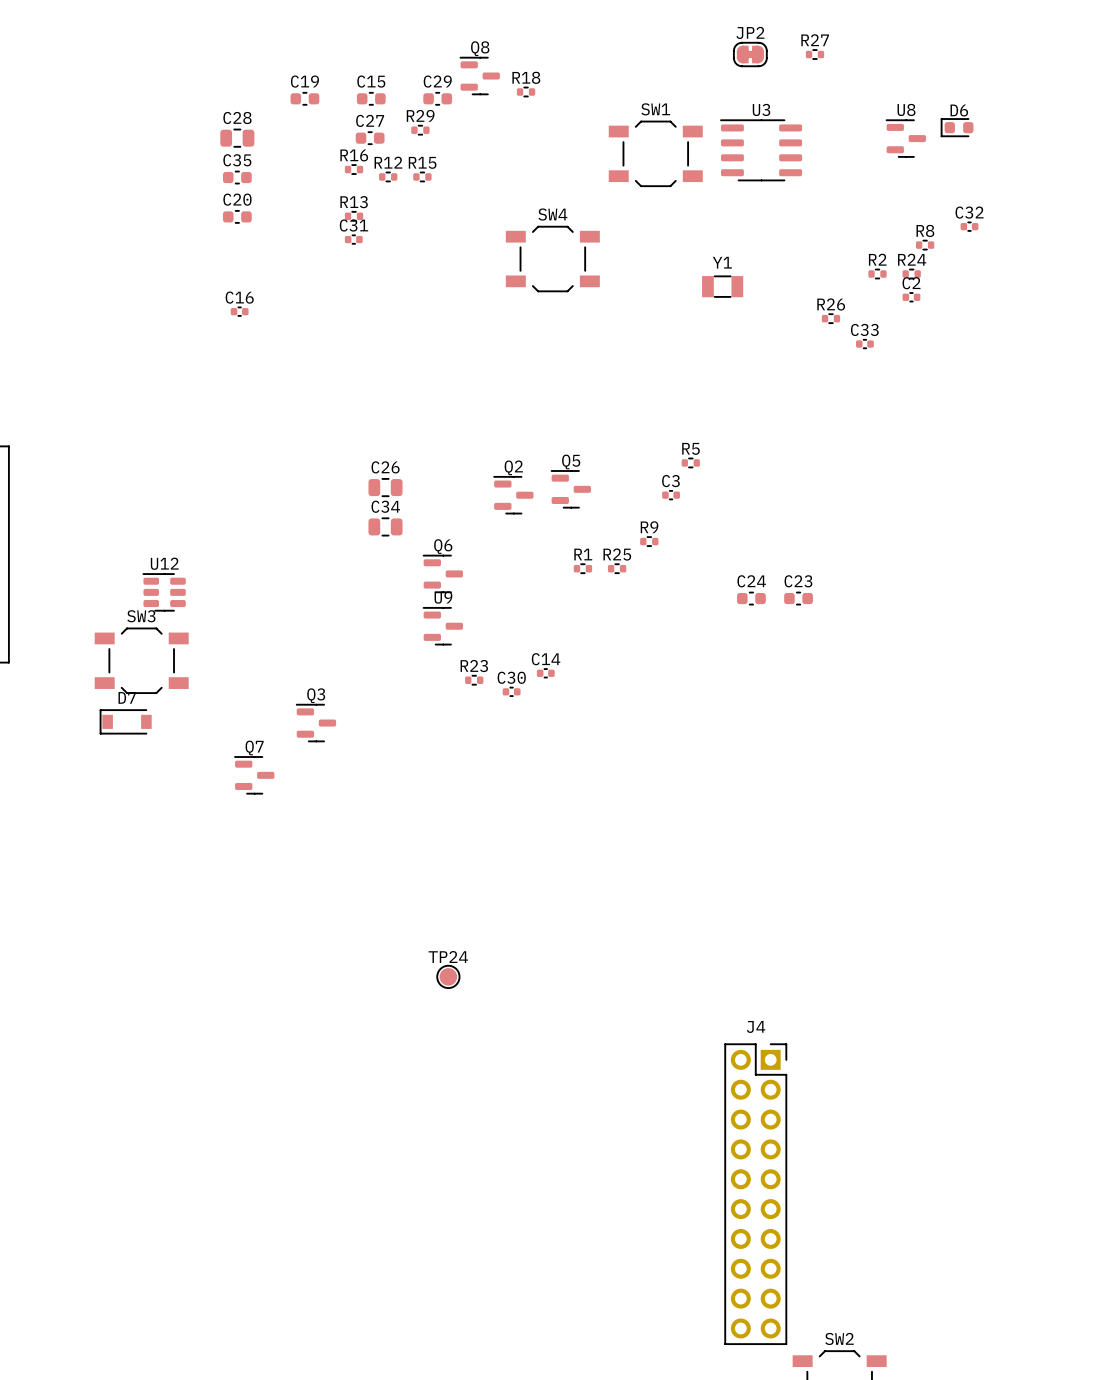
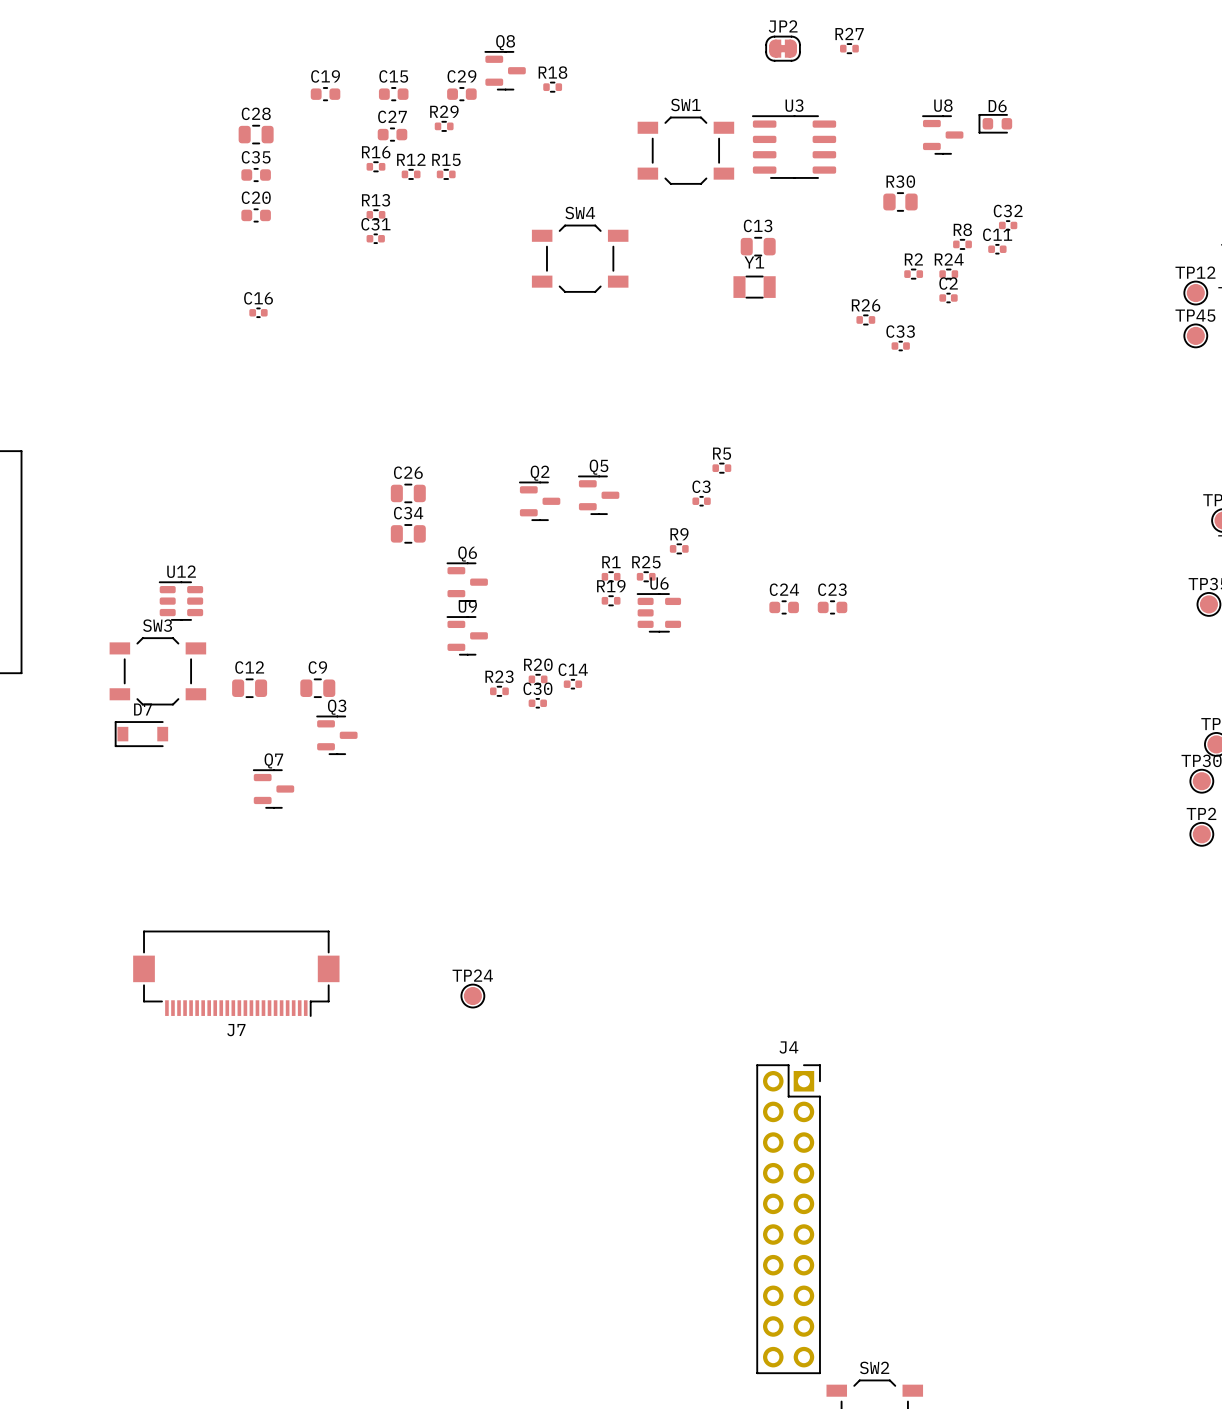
R30: none -> (900, 201)
C13: none -> (758, 246)
C11: none -> (997, 249)
R19: none -> (611, 600)
U6: none -> (658, 612)
R20: none -> (538, 679)
C12: none -> (249, 688)
C9: none -> (317, 688)
J7: none -> (236, 973)

